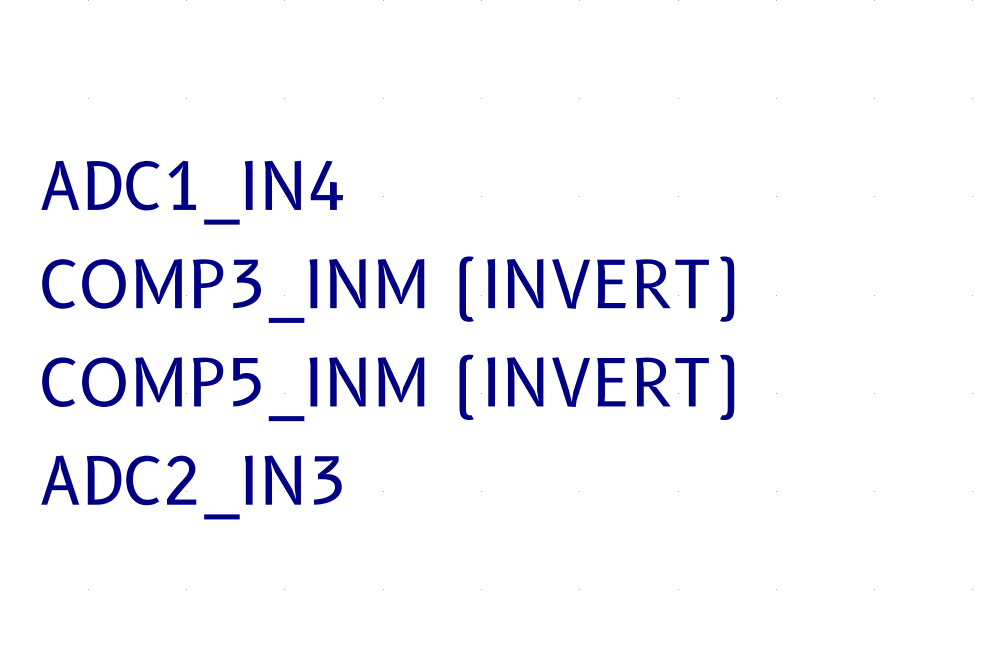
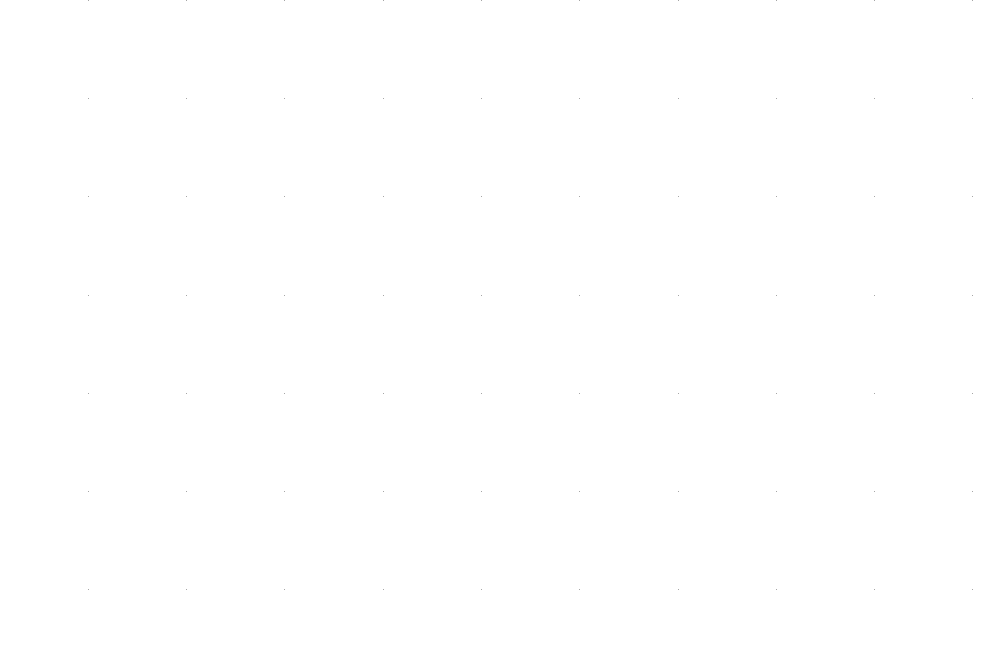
text: ADC1_IN4 (192, 192) -> none
text: COMP3_INM (INVERT) (388, 289) -> none
text: COMP5_INM (INVERT) (388, 387) -> none
text: ADC2_IN3 (191, 487) -> none

